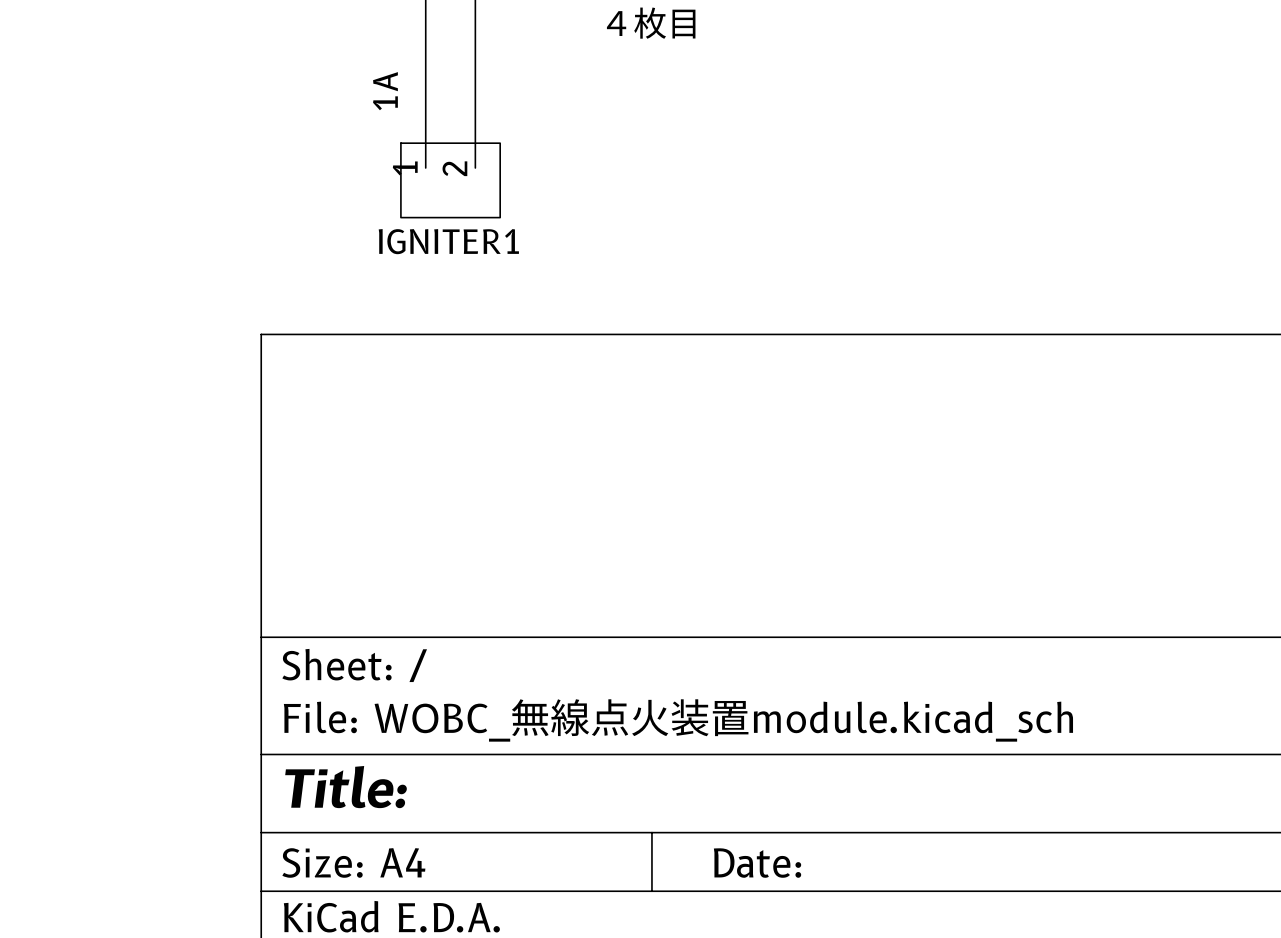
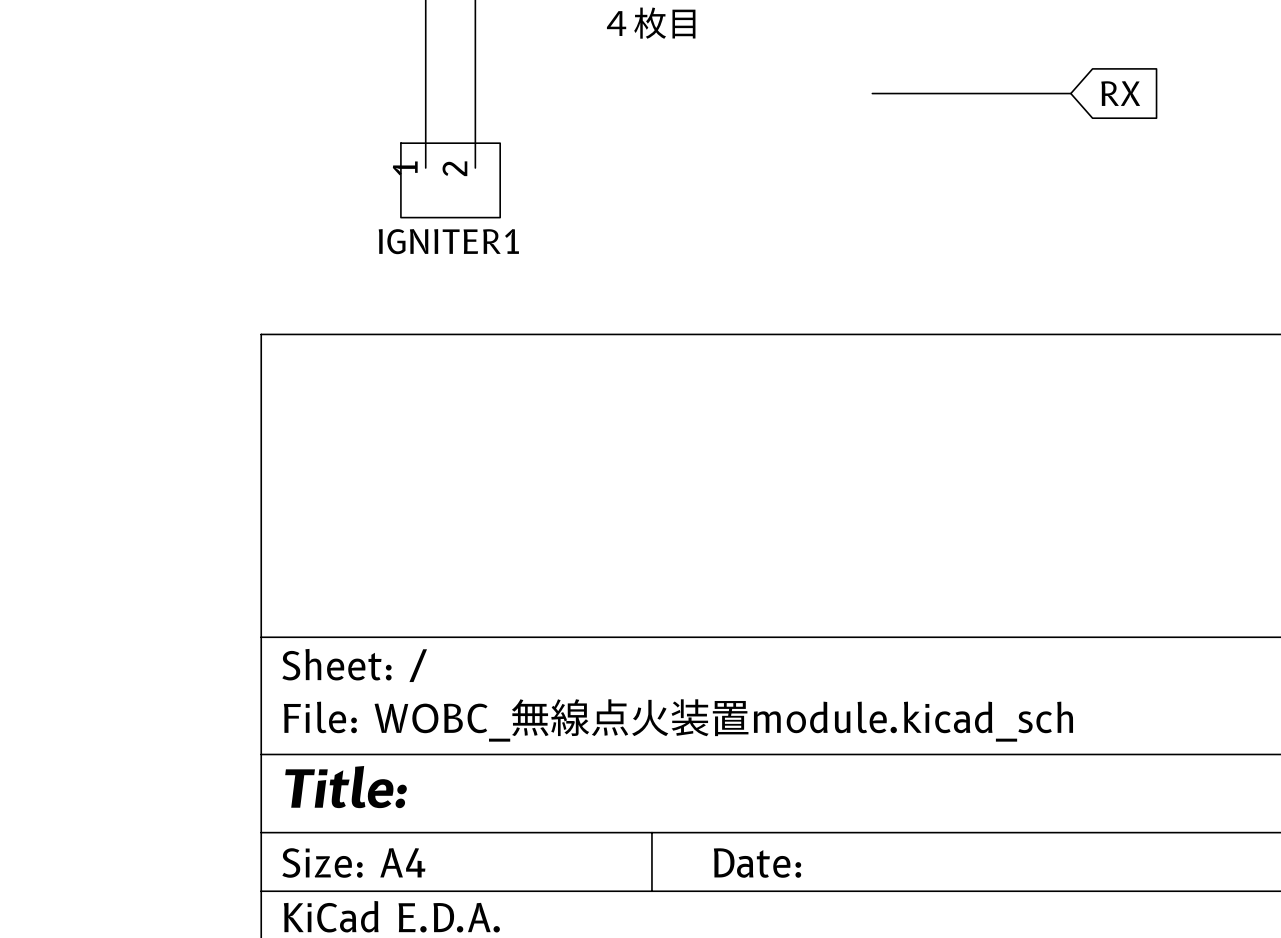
text: 1A (385, 91) -> none
wire: none -> (872, 93) (1070, 93)
global label: none -> RX (1120, 93)

